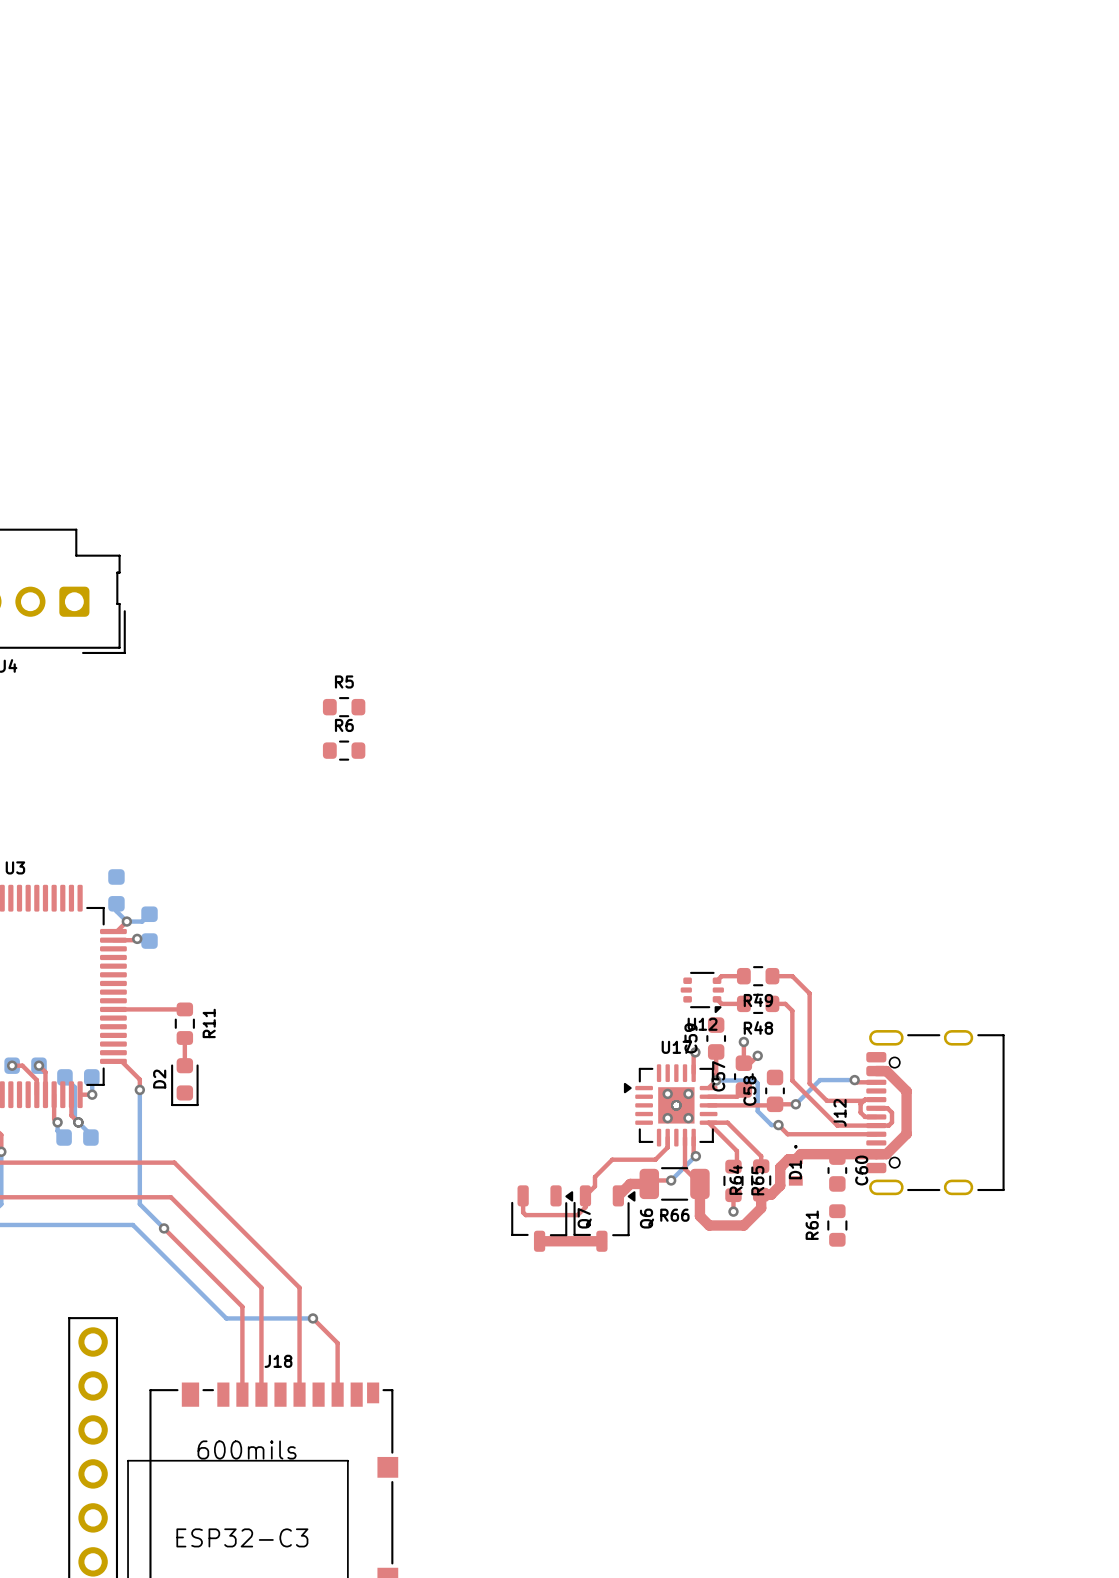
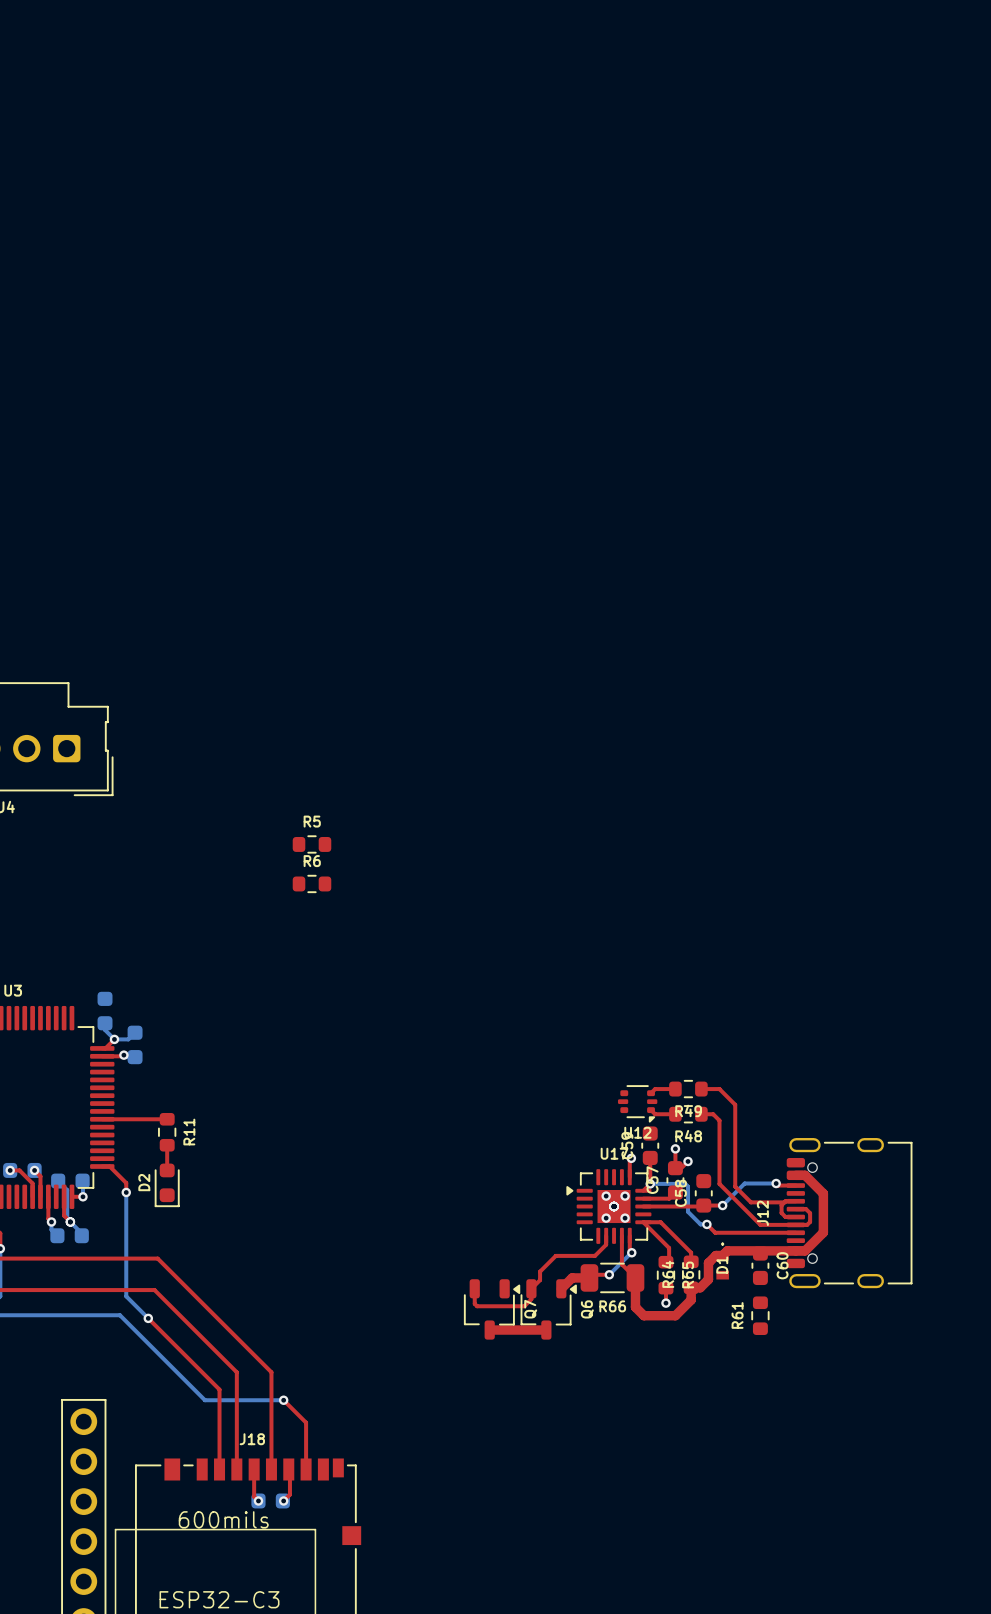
top track: none -> (254, 1469) (254, 1496) (258, 1500)
top track: none -> (288, 1469) (289, 1494) (283, 1500)
via: none -> (258, 1500)
part: none -> (270, 1500)
via: none -> (283, 1500)

